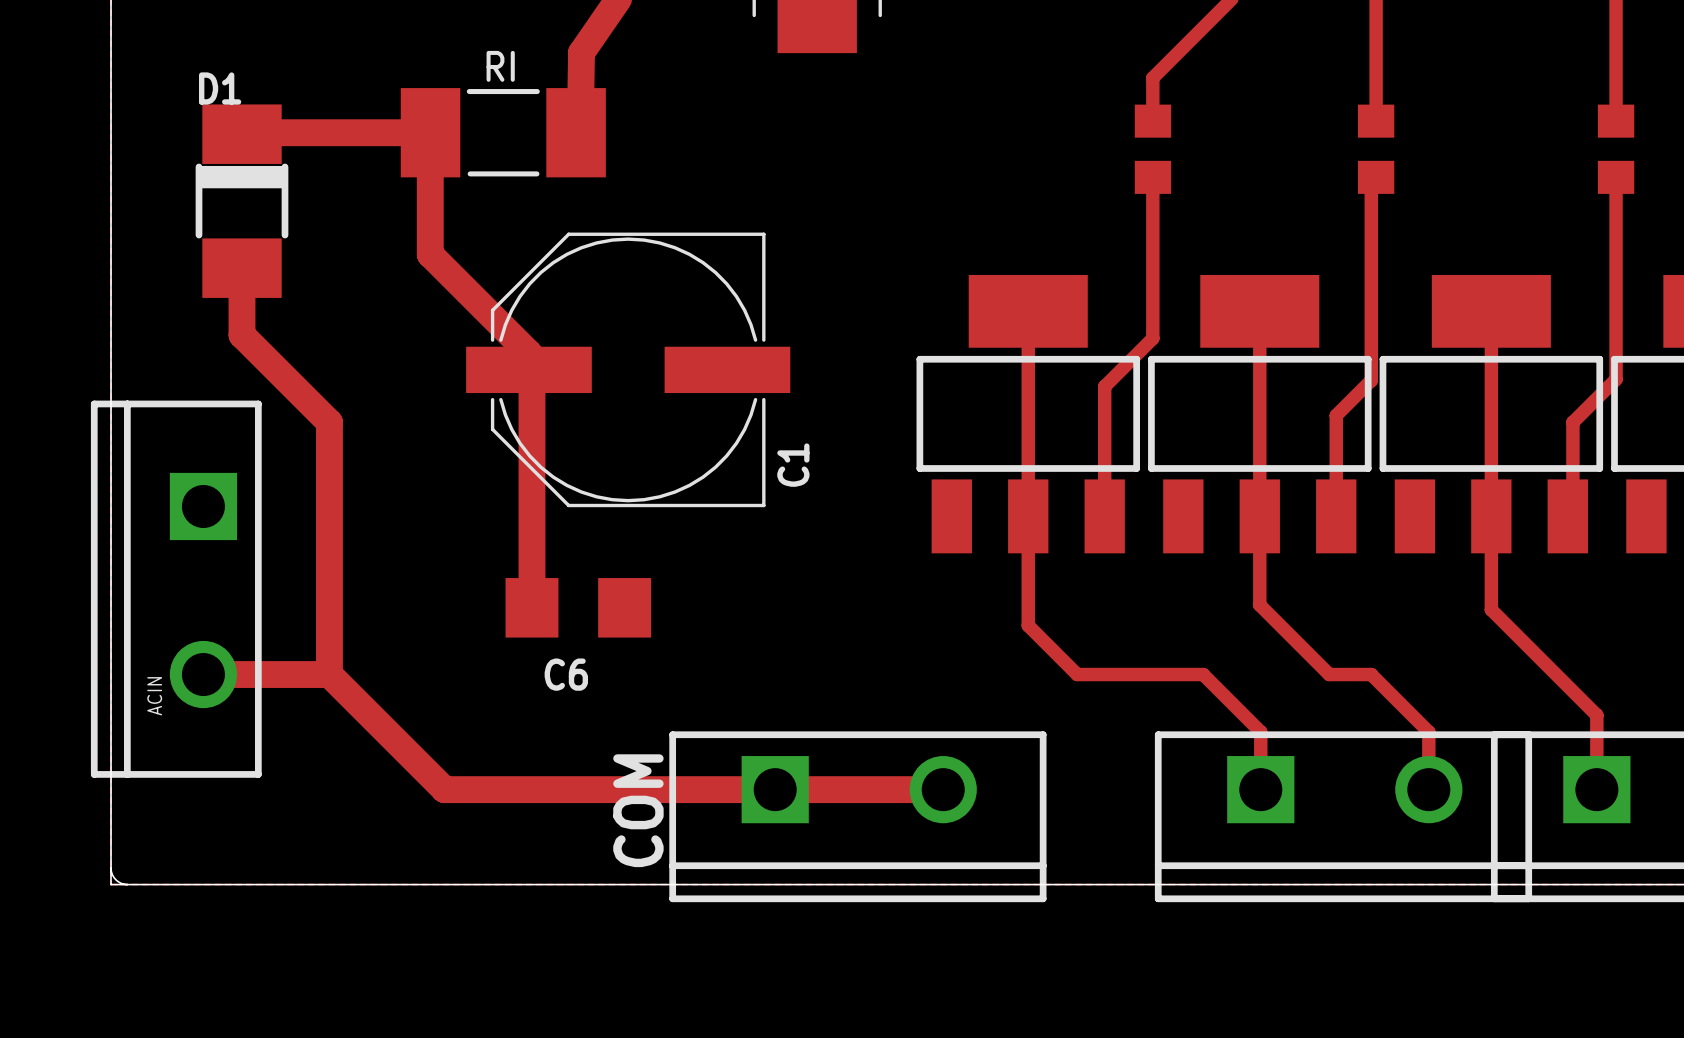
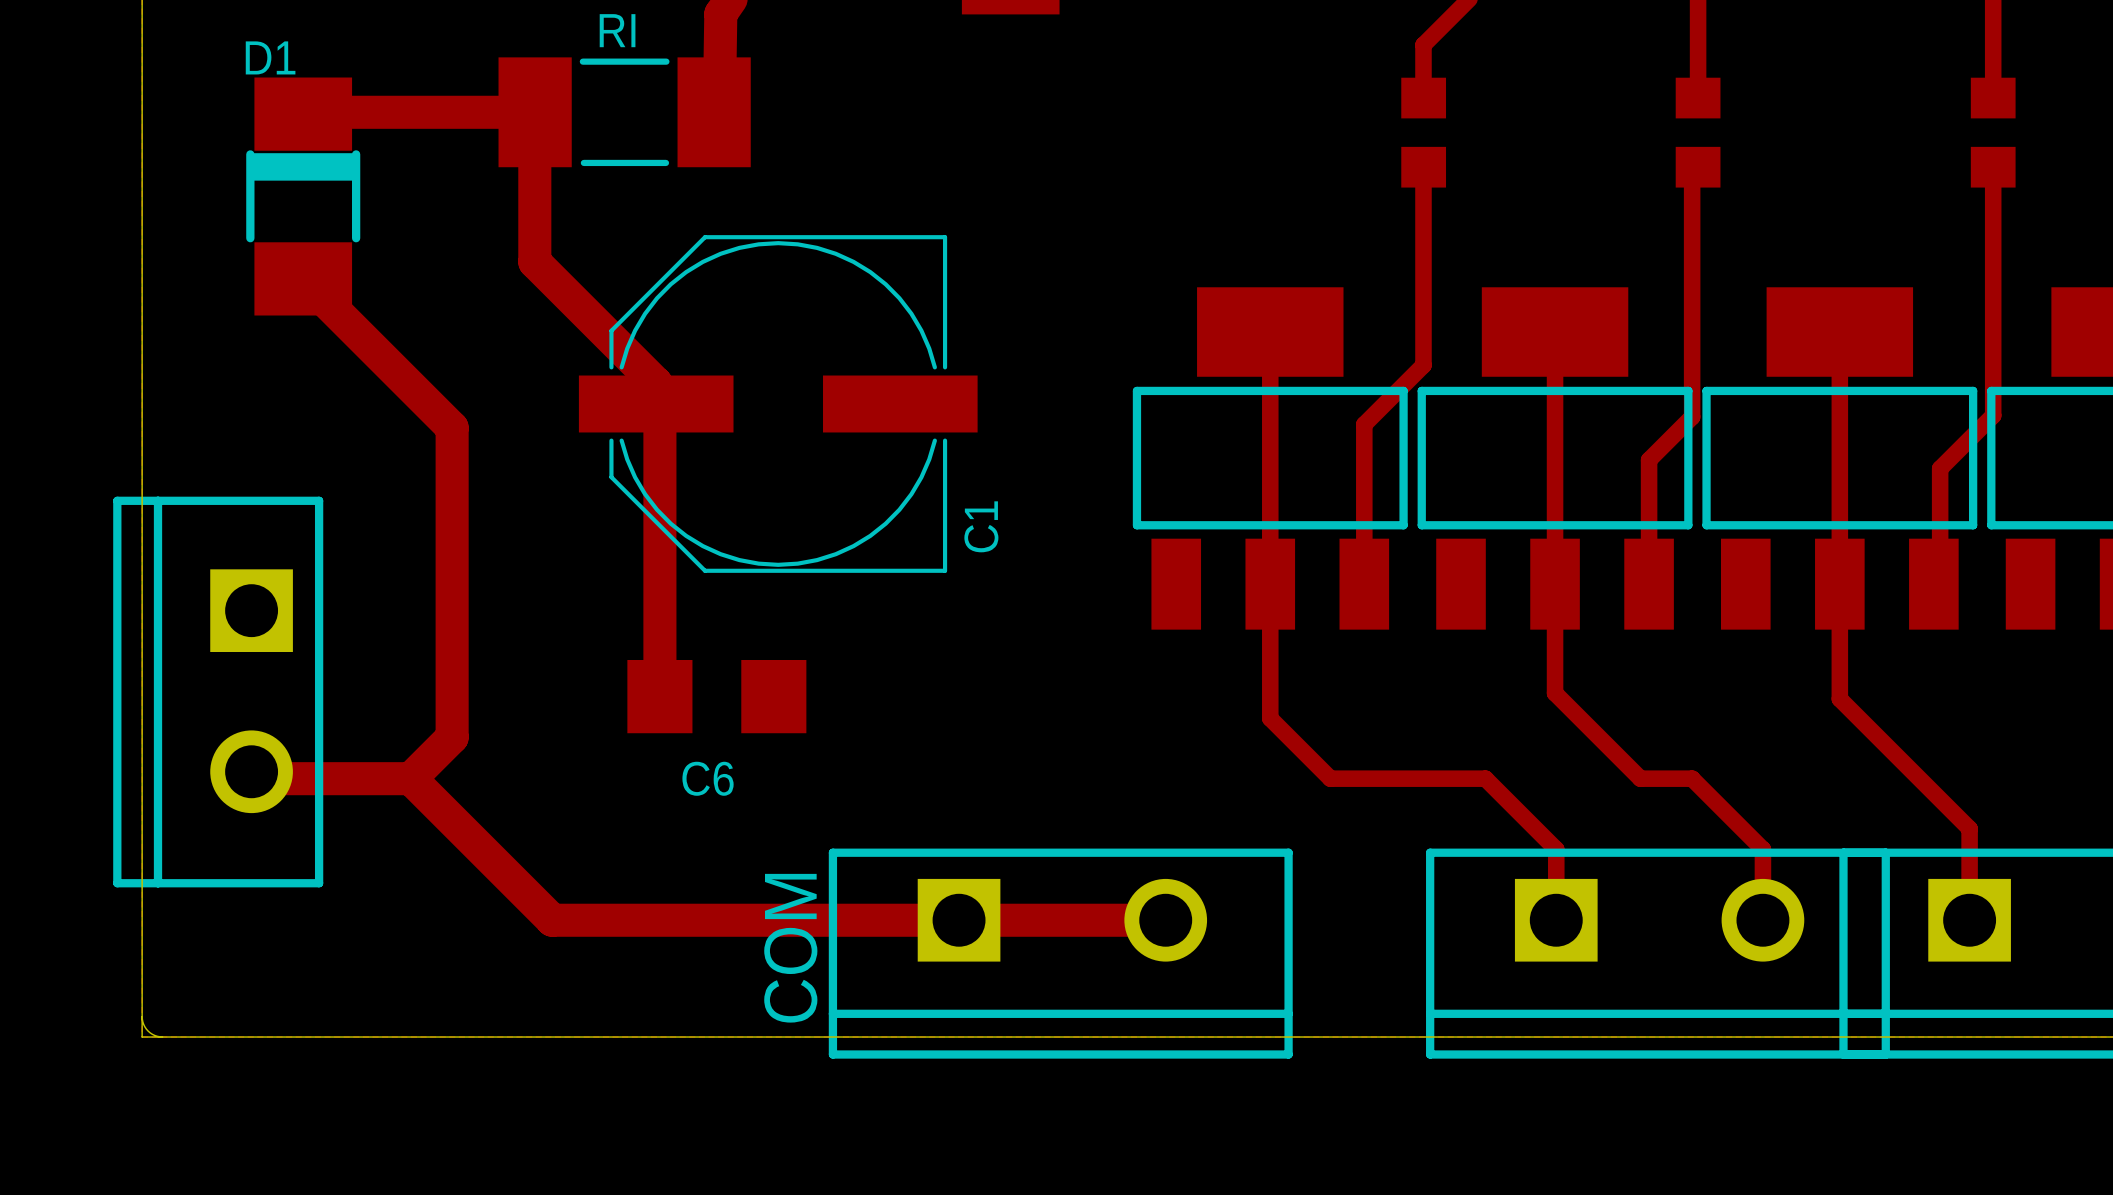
track: (242, 268) (242, 335) (329, 422) (329, 674) -> (303, 278) (452, 427) (452, 737) (410, 778)
ACIN: (176, 589) -> none
part: none -> (218, 692)

